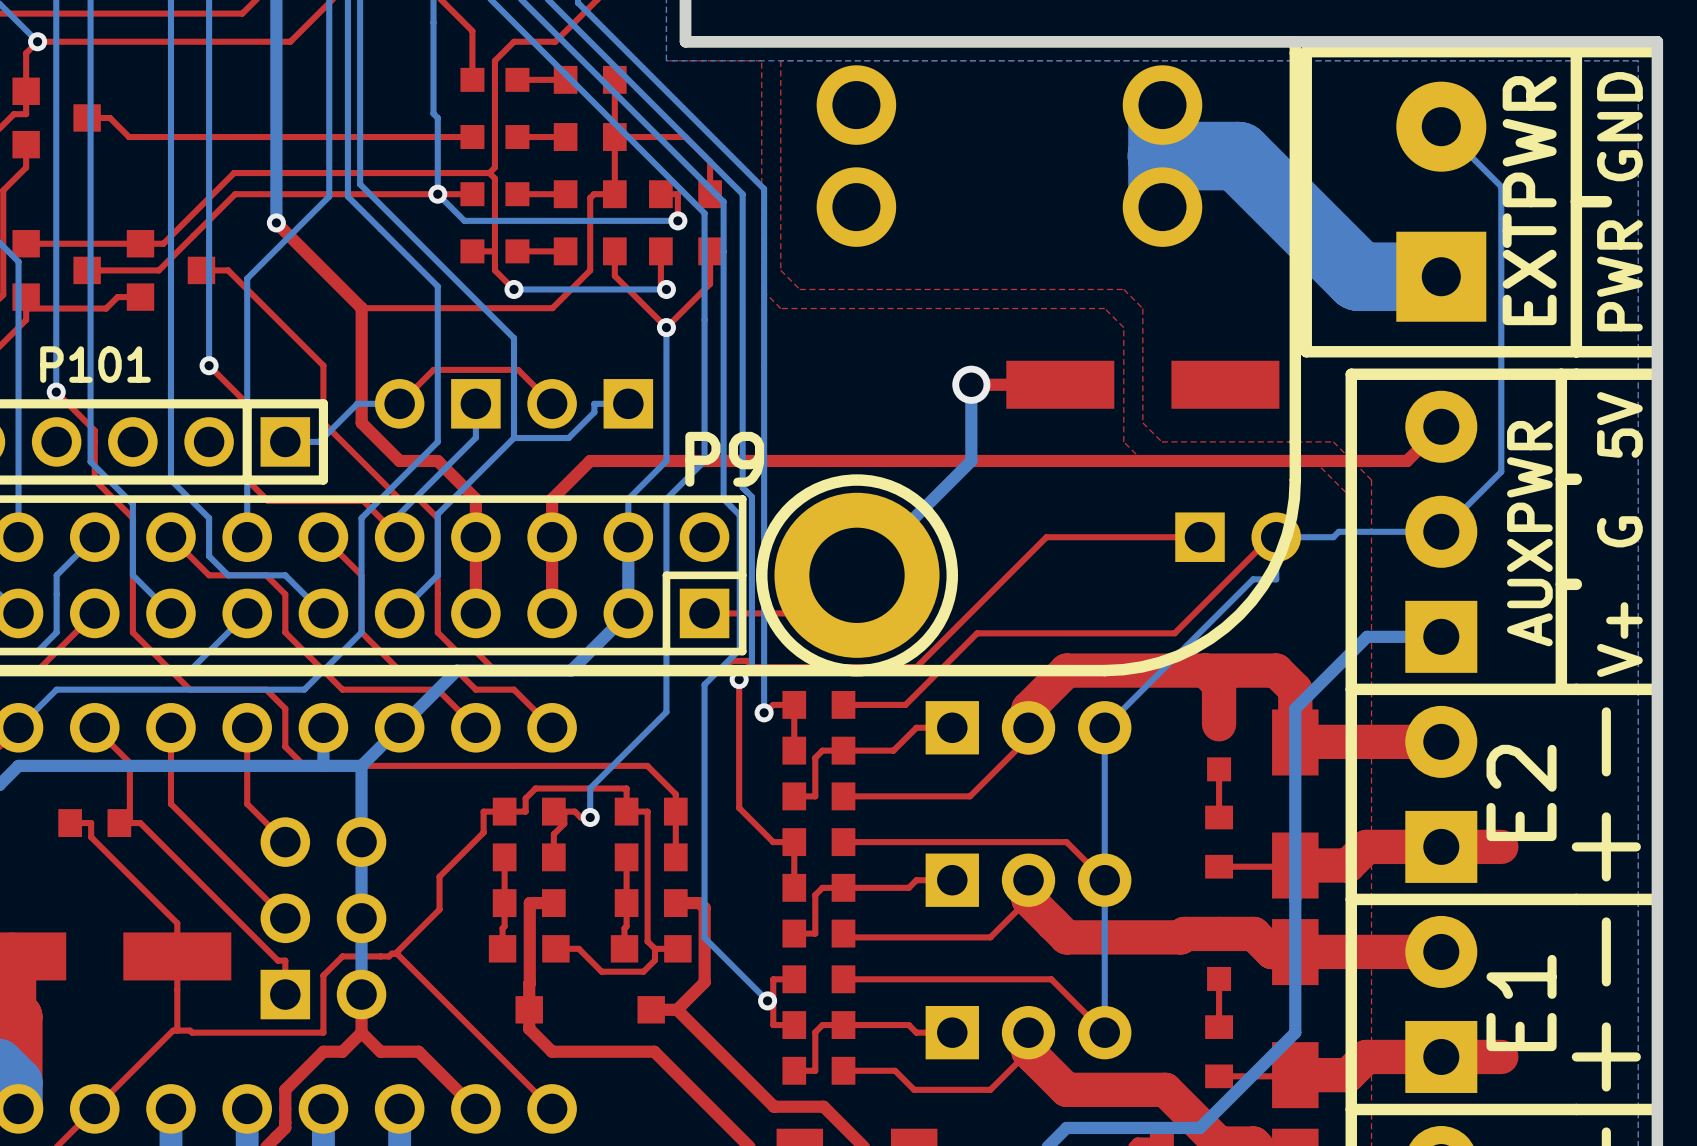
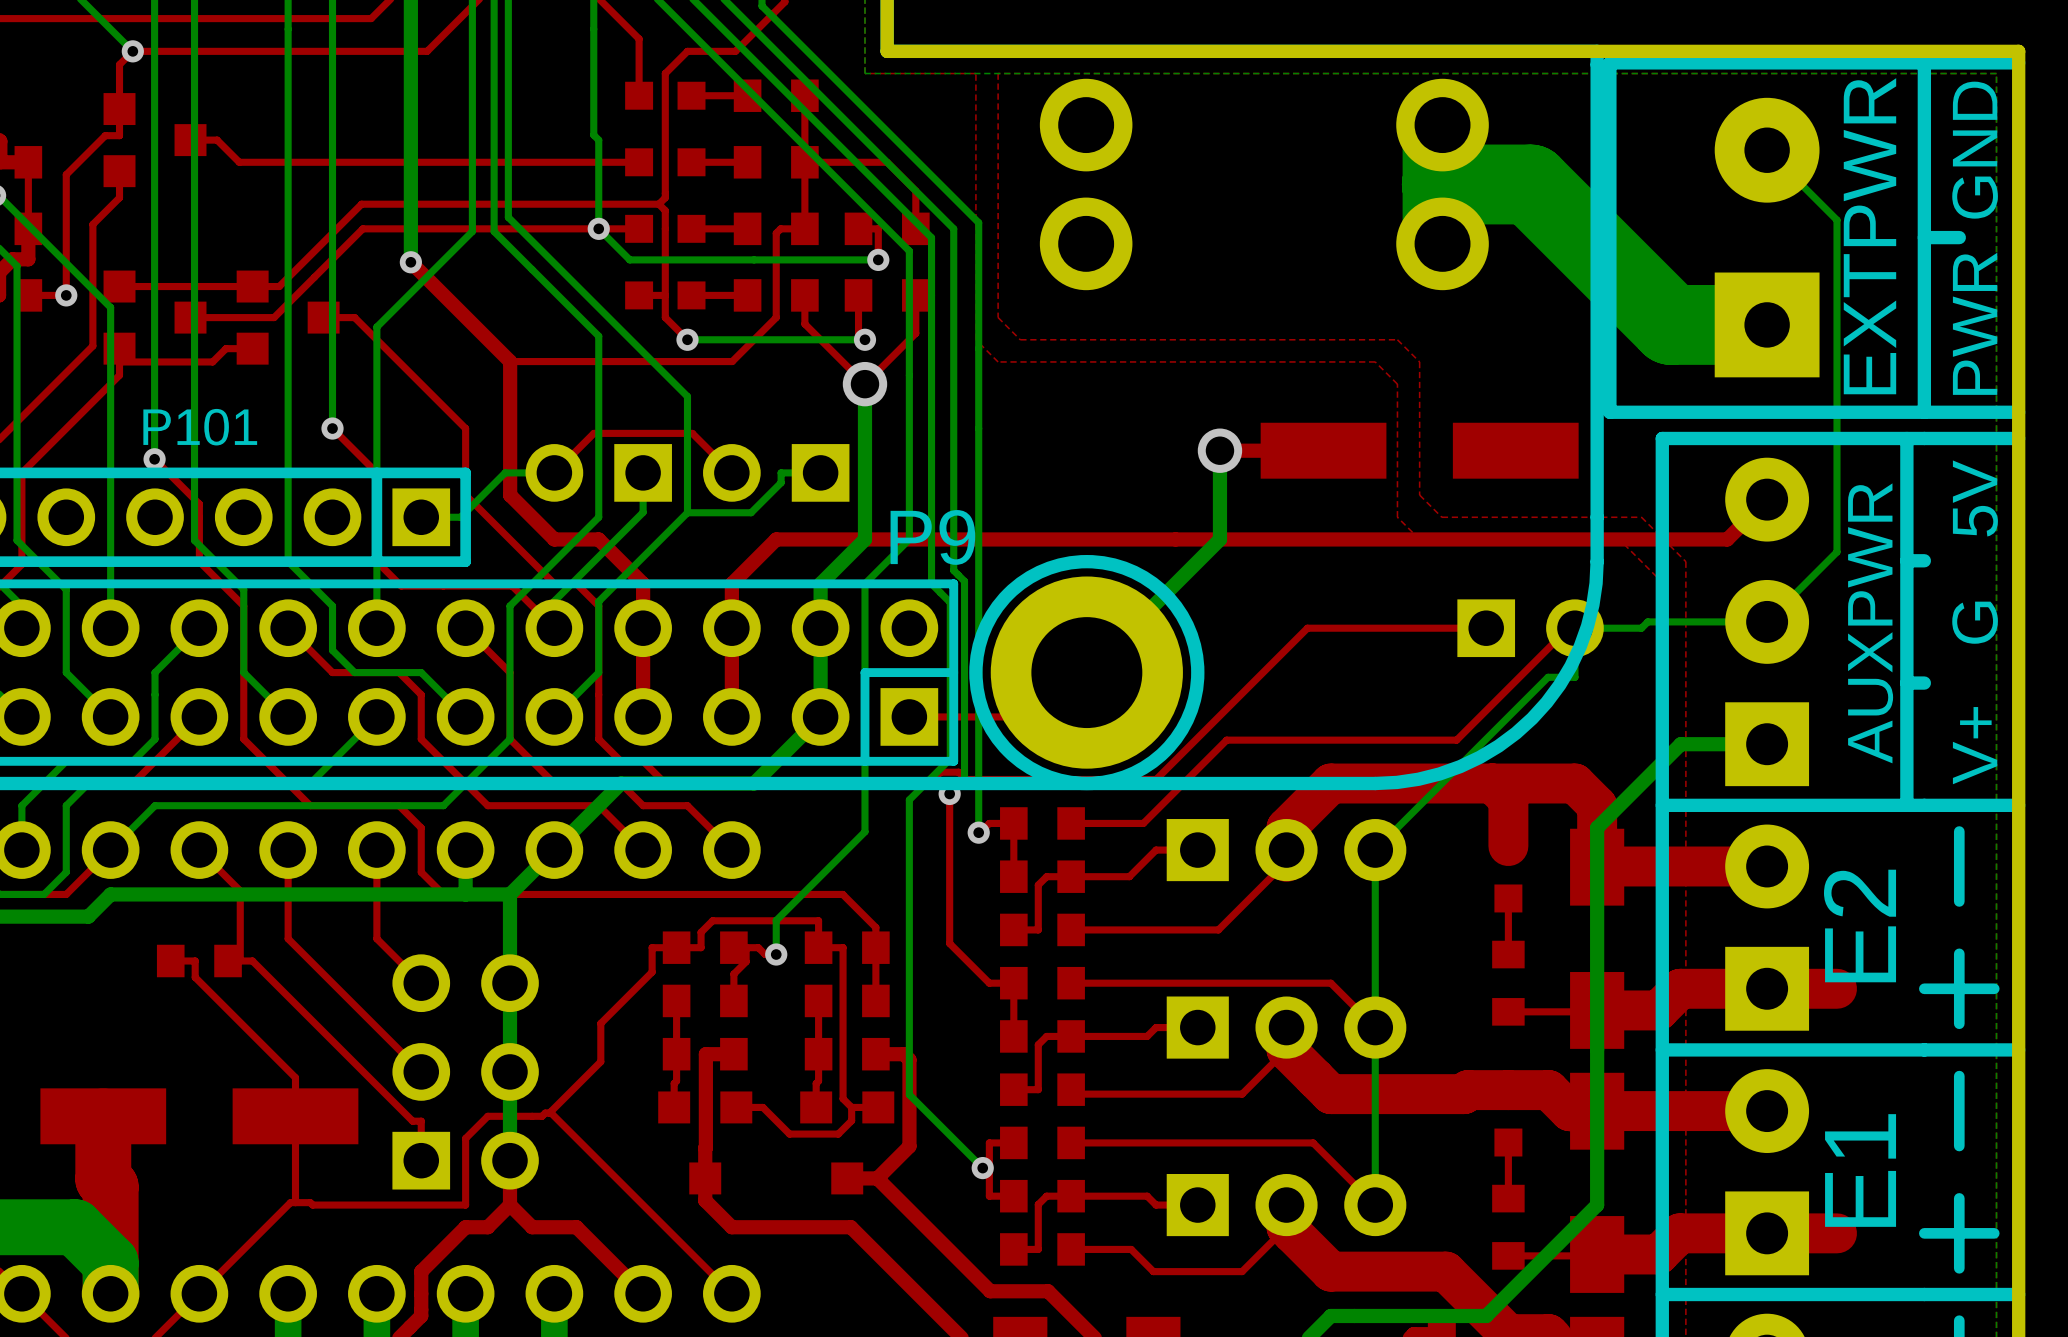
via size: [656, 318, 676, 338] -> [842, 361, 888, 407]
bottom track width: thin (666, 327) (666, 460) (628, 499) (628, 537) -> thick (864, 384) (864, 539) (820, 583) (820, 628)

